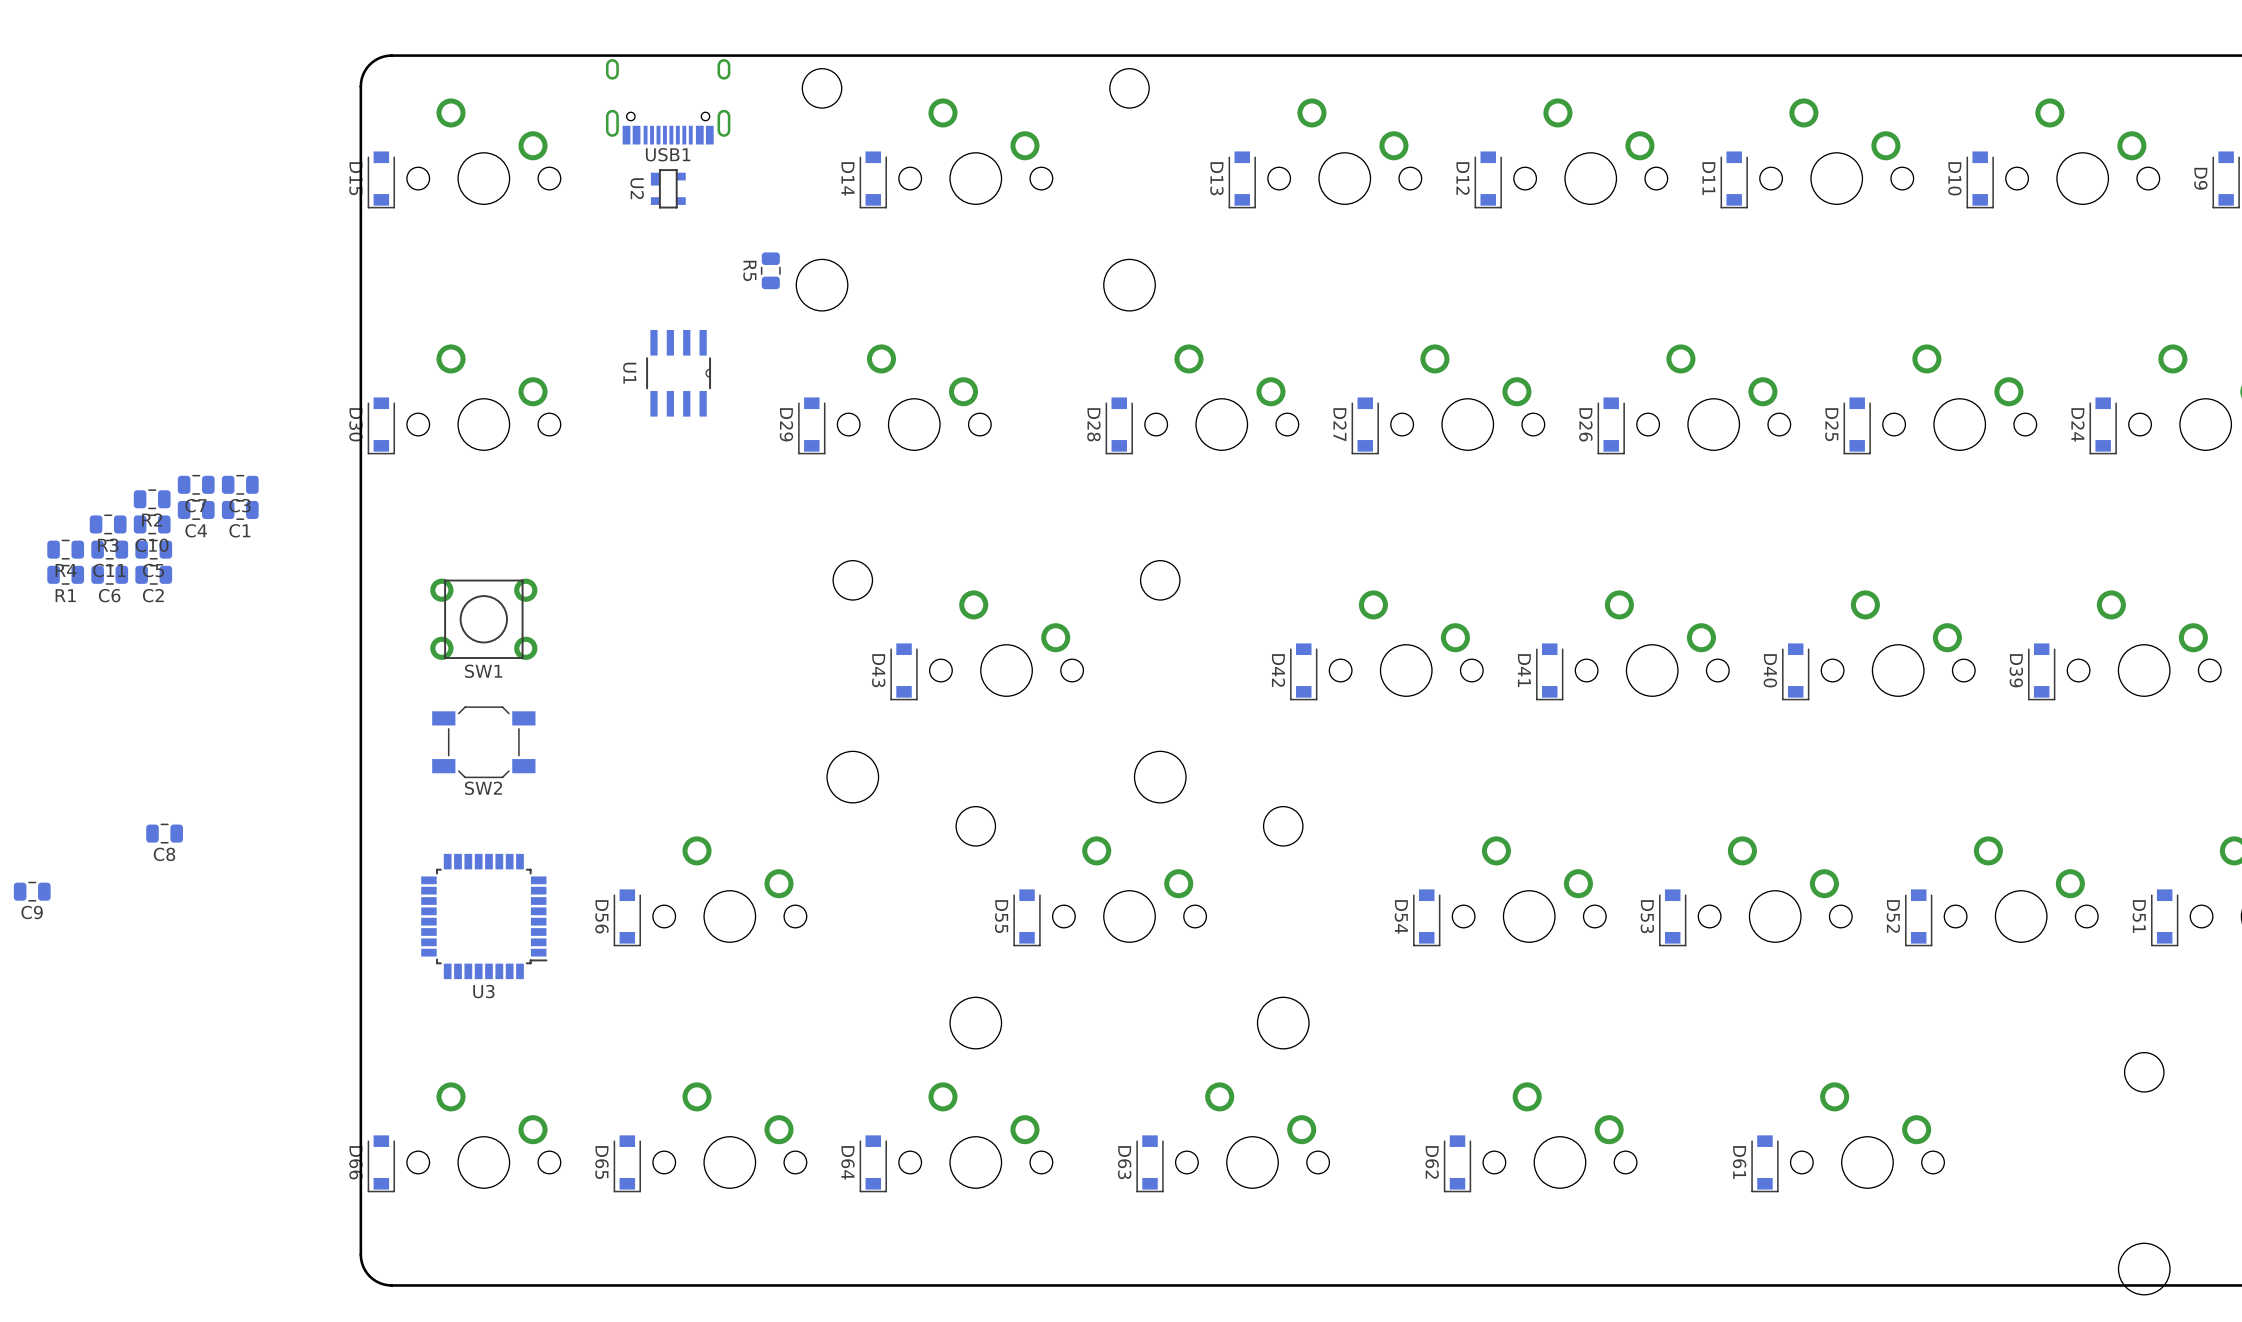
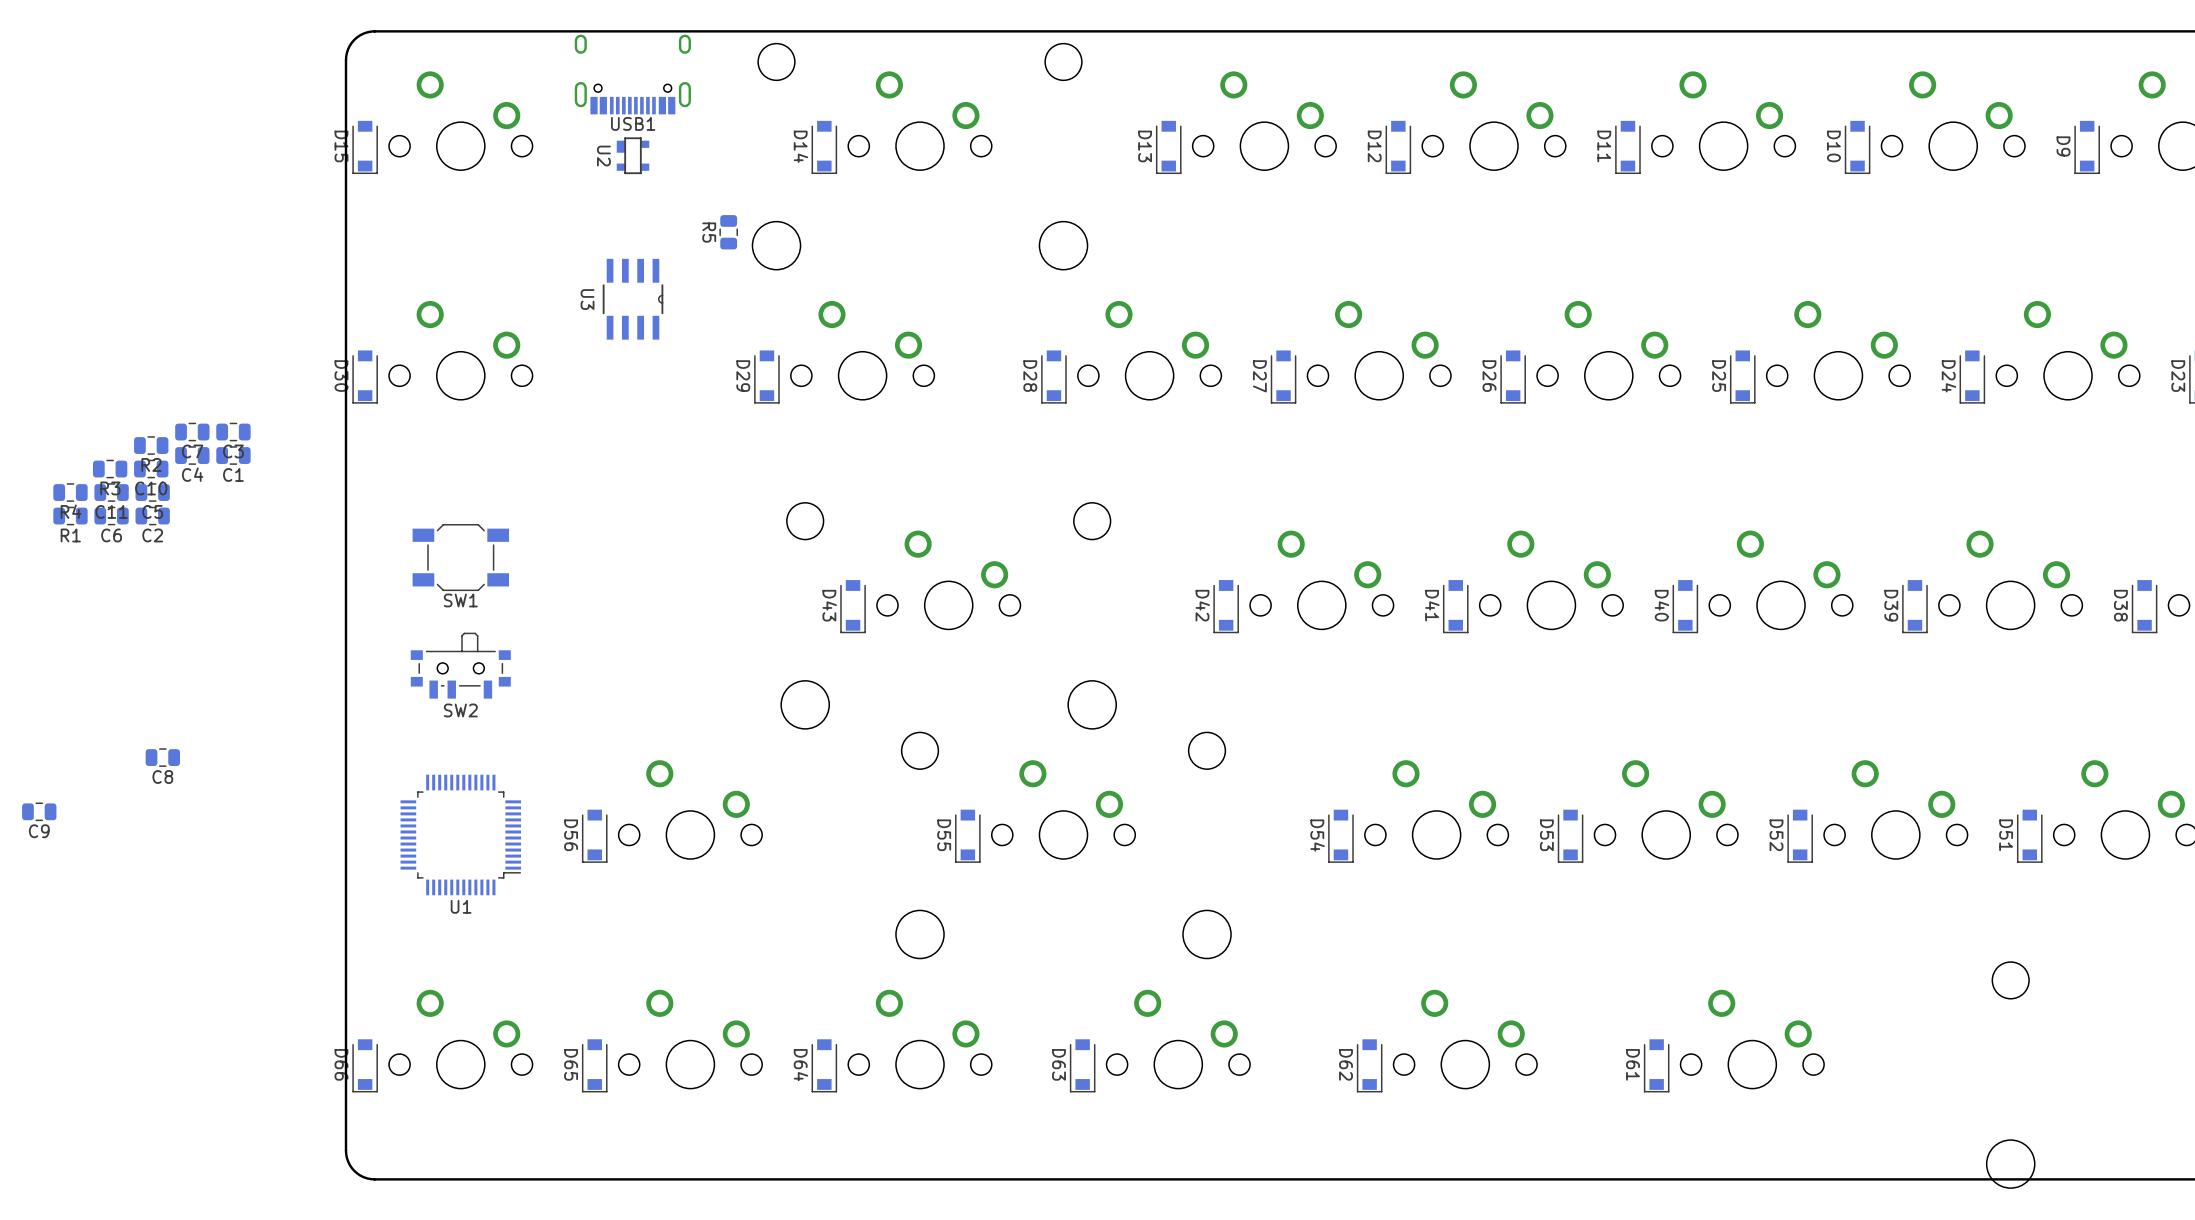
U1 footprint: [646, 330, 712, 417] -> [400, 774, 522, 896]
U1 name position: U1 (629, 373) -> U1 (461, 906)
SW1 footprint: [430, 578, 538, 660] -> [412, 524, 510, 592]
SW2 footprint: [432, 706, 536, 779] -> [410, 632, 511, 699]
U3 footprint: [421, 853, 548, 980] -> [602, 258, 664, 340]
U3 name position: U3 (483, 991) -> U3 (587, 299)

